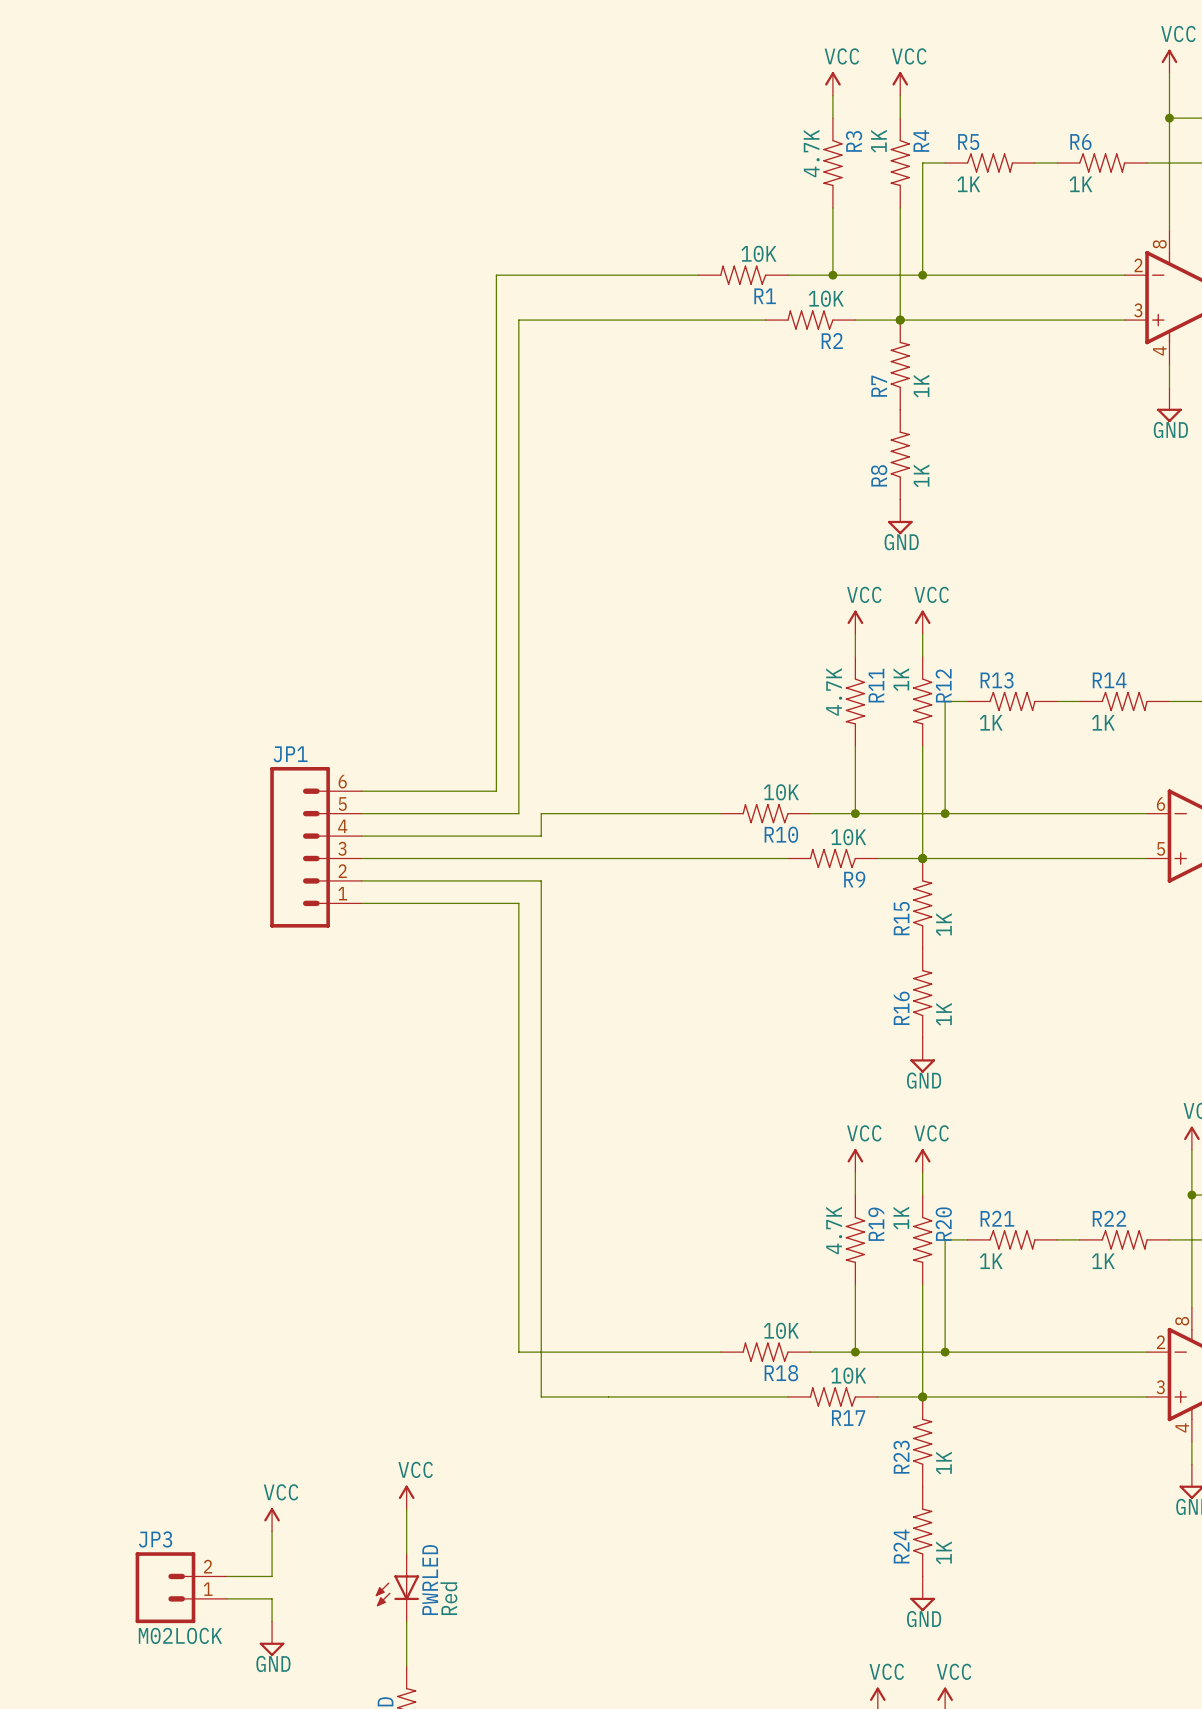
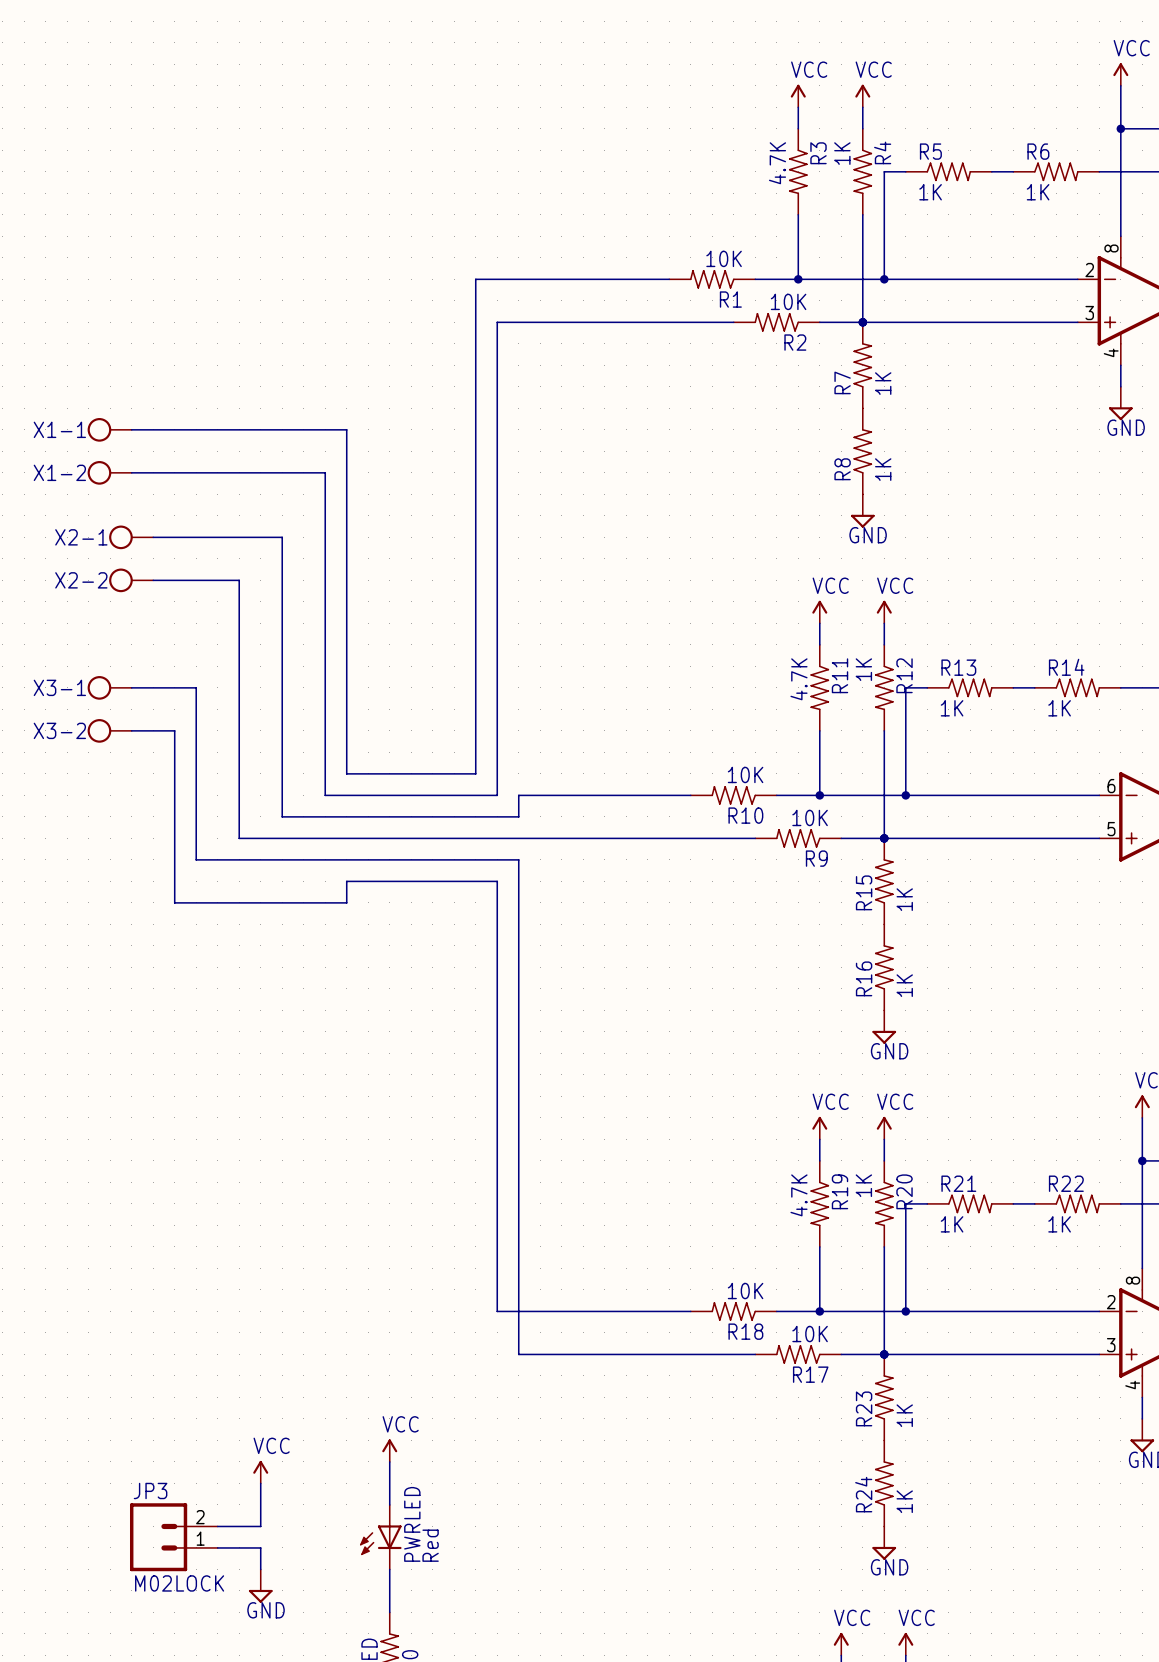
X1-1: none -> (109, 429)
wire: none -> (131, 429) (346, 429) (346, 773)
X1-2: none -> (109, 472)
wire: none -> (131, 472) (325, 472) (325, 795) (346, 795)
X2-1: none -> (131, 537)
wire: none -> (153, 537) (282, 537) (282, 816) (346, 816)
X2-2: none -> (131, 580)
wire: none -> (153, 580) (239, 580) (239, 838) (346, 838)
X3-1: none -> (109, 687)
wire: none -> (131, 687) (196, 687) (196, 859) (346, 859)
X3-2: none -> (109, 730)
wire: none -> (131, 730) (174, 730) (174, 902) (346, 902) (346, 881)
JP1: (316, 847) -> none

